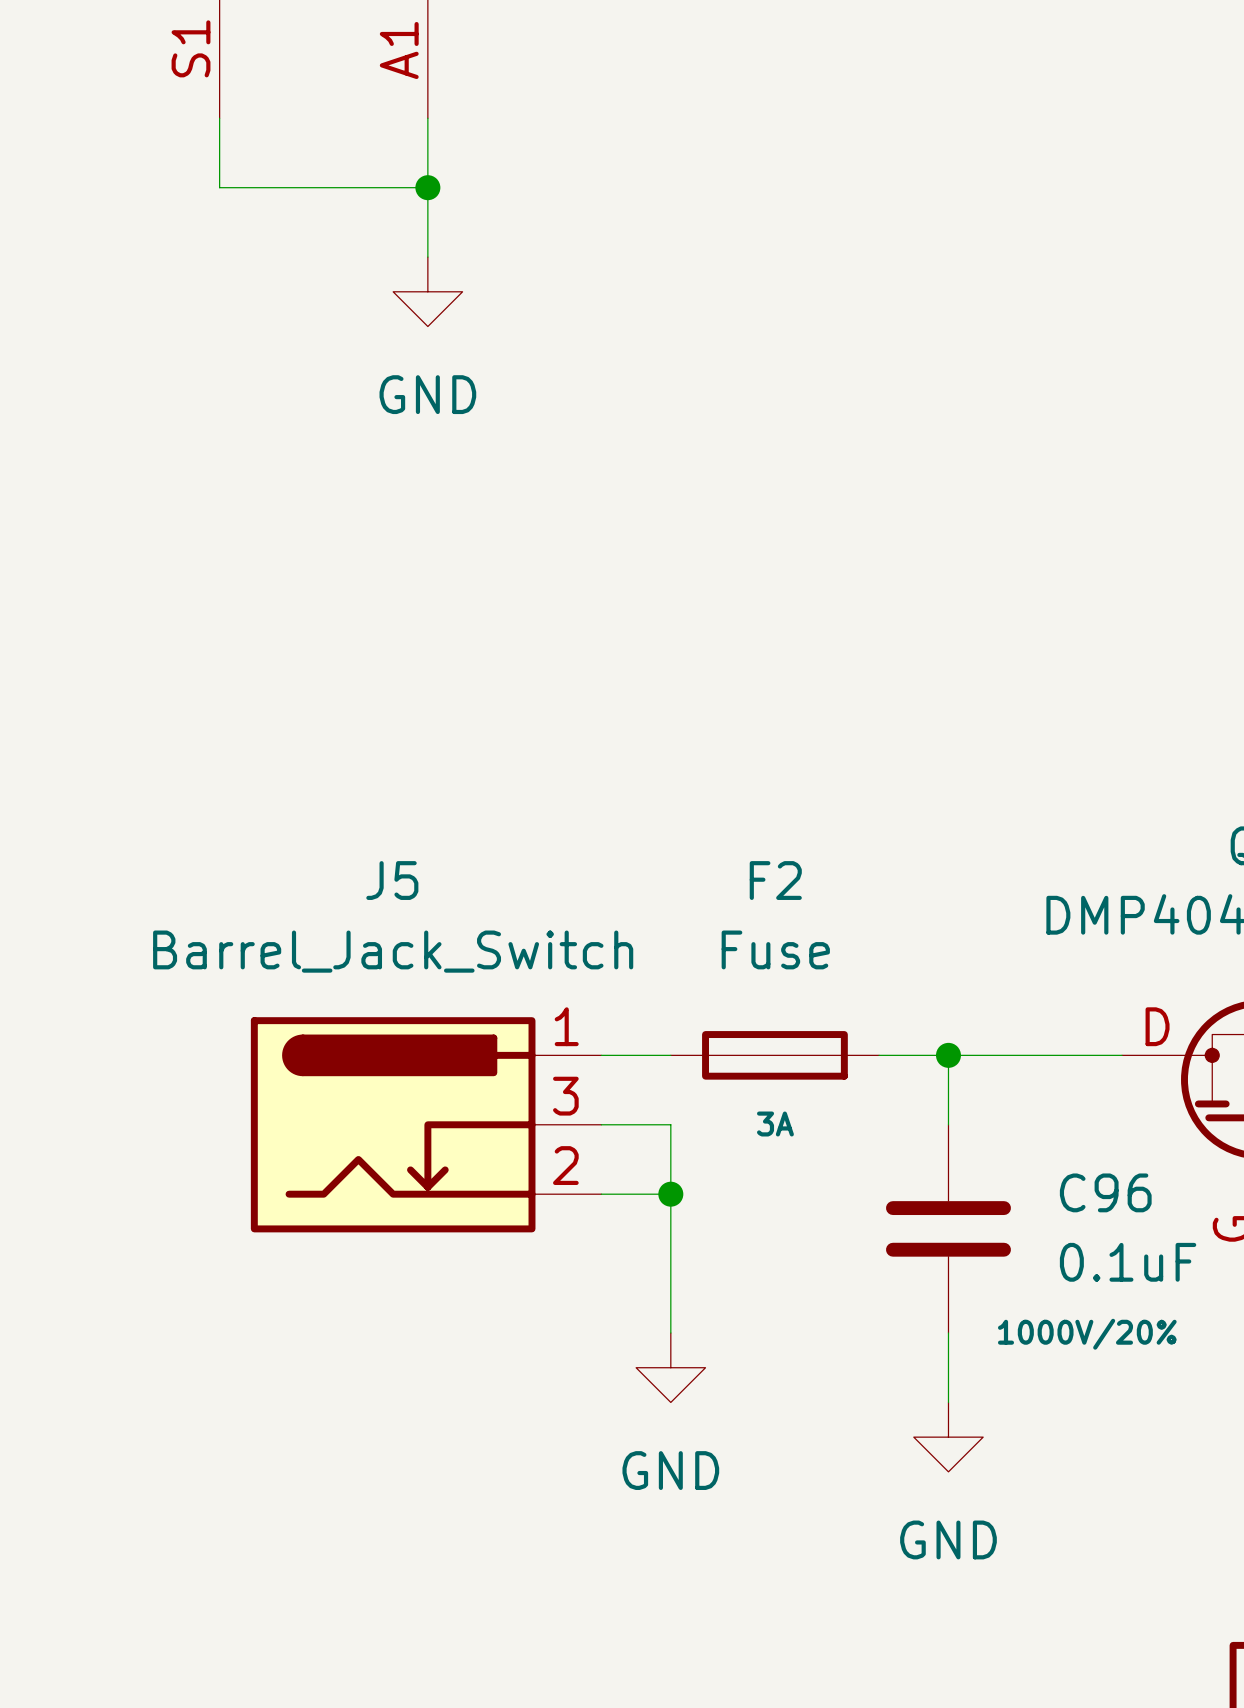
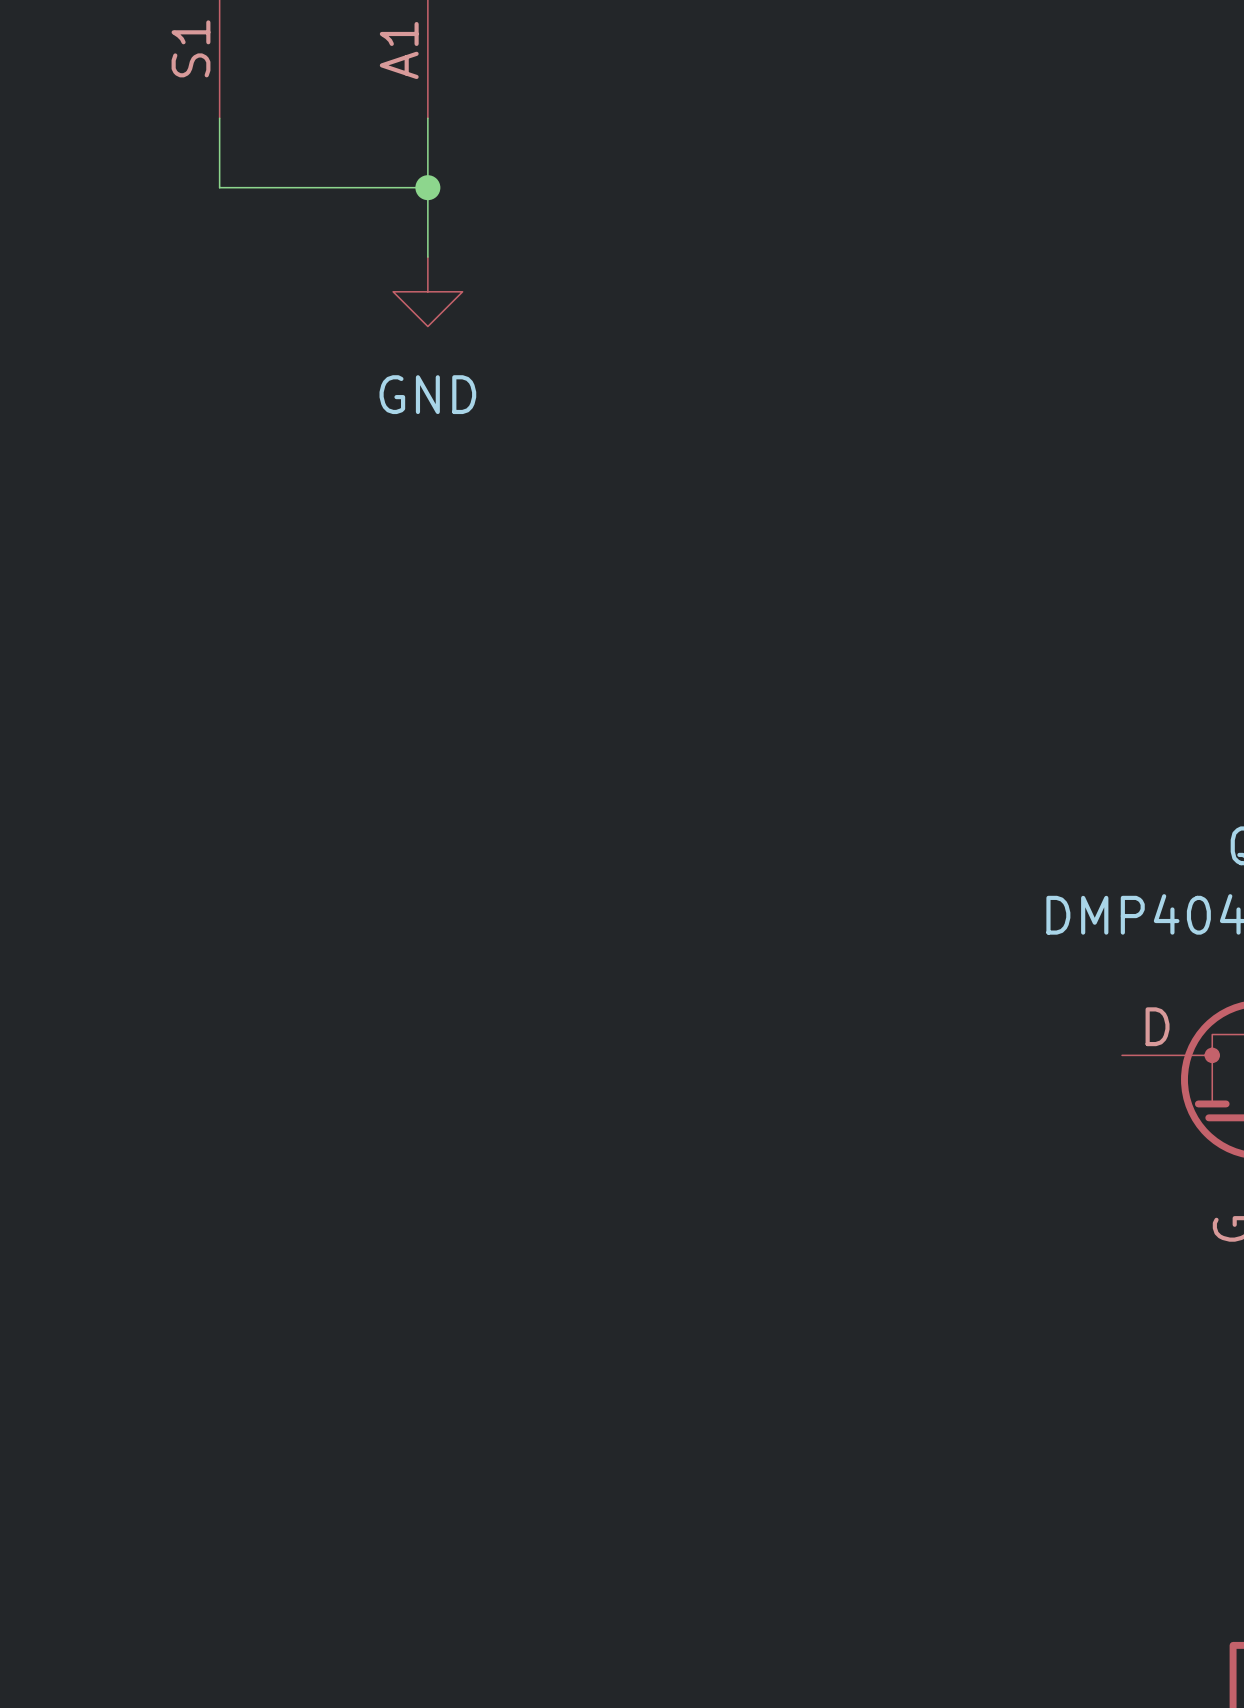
wire: (601, 1055) (670, 1055) -> none
F2: Fuse (774, 1055) -> none
wire: (879, 1055) (1122, 1055) -> none
wire: (948, 1055) (948, 1124) -> none
junction: (948, 1055) -> none
J5: Barrel_Jack_Switch (426, 1124) -> none
wire: (601, 1124) (670, 1124) (670, 1333) -> none
wire: (601, 1194) (670, 1194) -> none
junction: (670, 1194) -> none
C96: 0.1uF (948, 1228) -> none
wire: (948, 1333) (948, 1402) -> none
power symbol: GND (670, 1367) -> none
power symbol: GND (948, 1437) -> none

